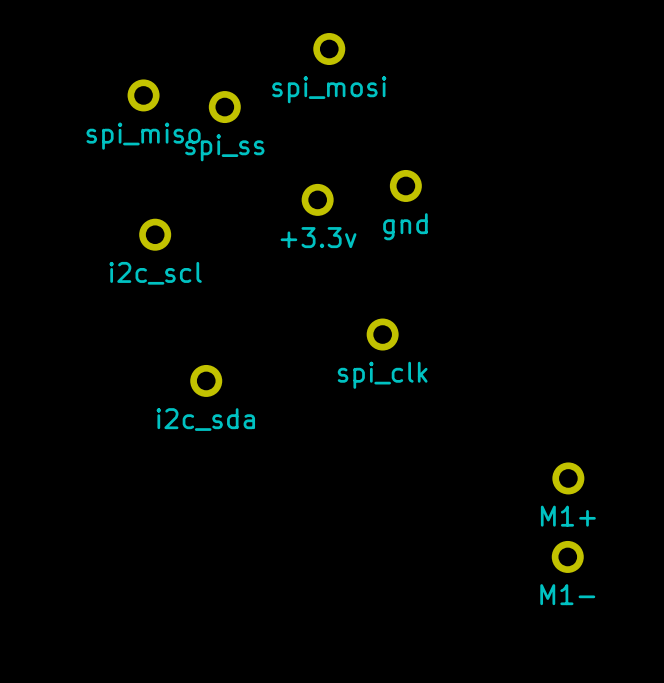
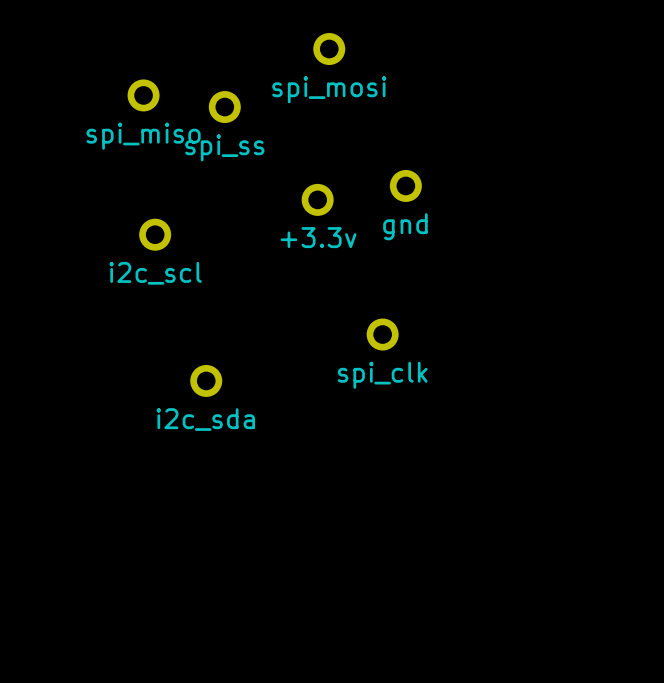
part: M1+ (568, 478) -> none
part: M1- (567, 556) -> none

